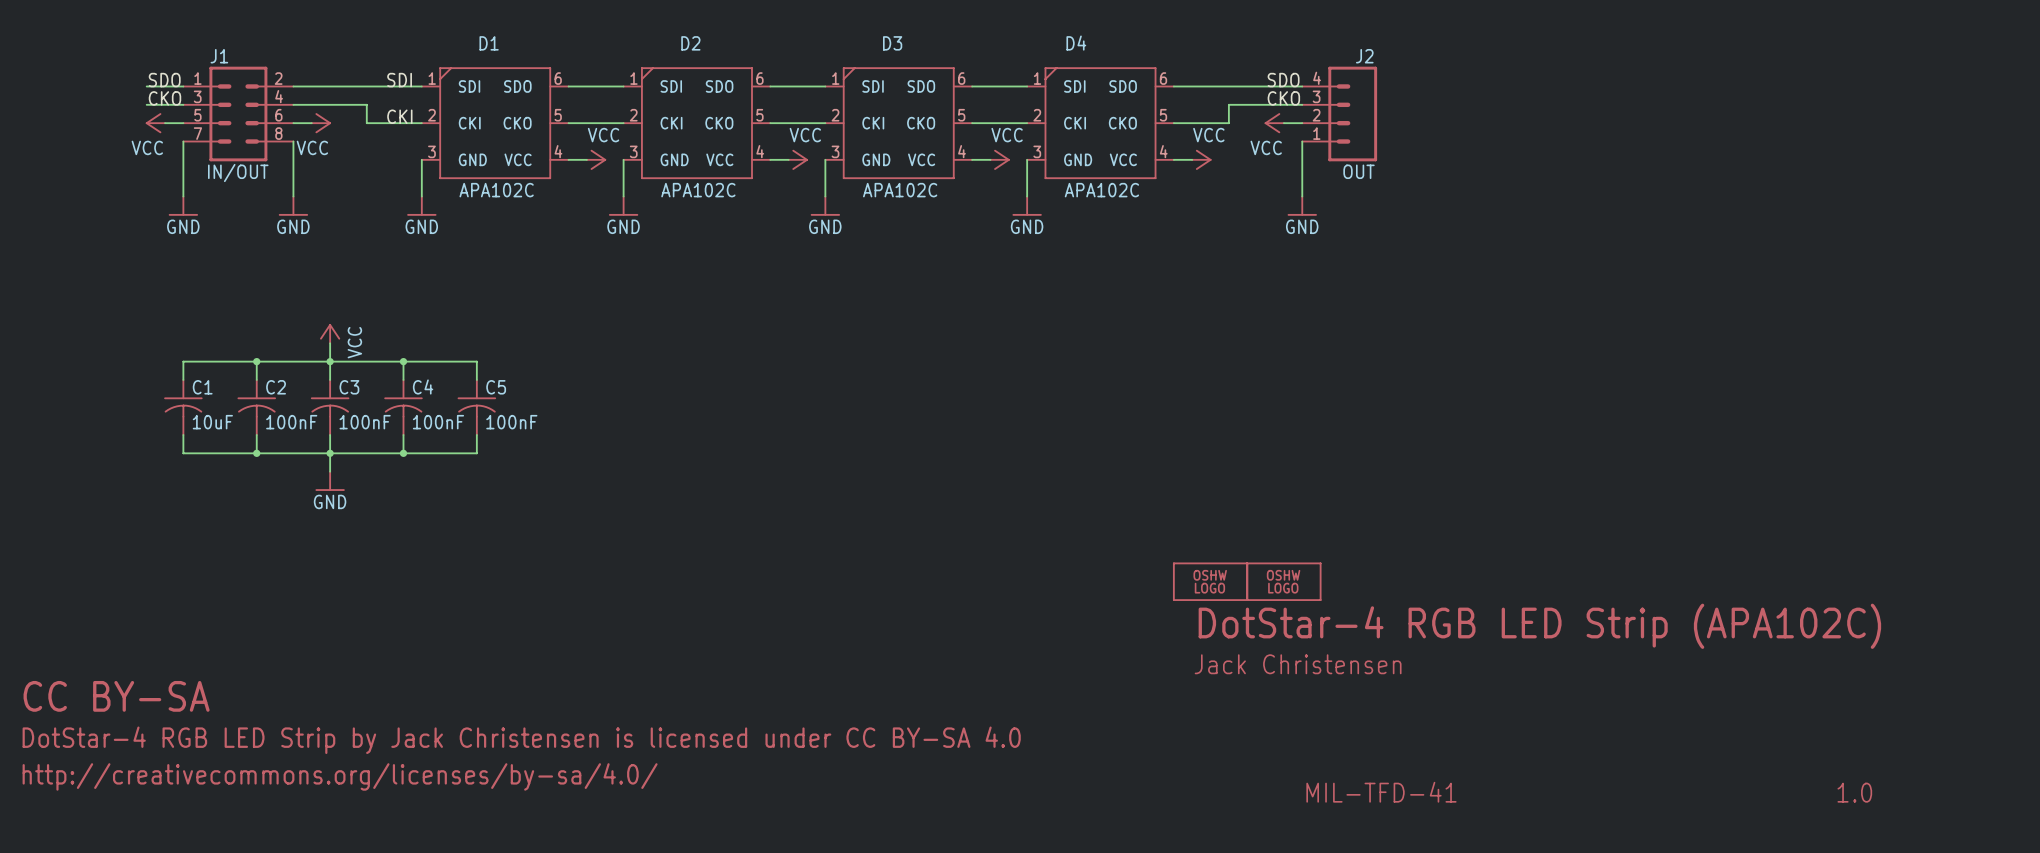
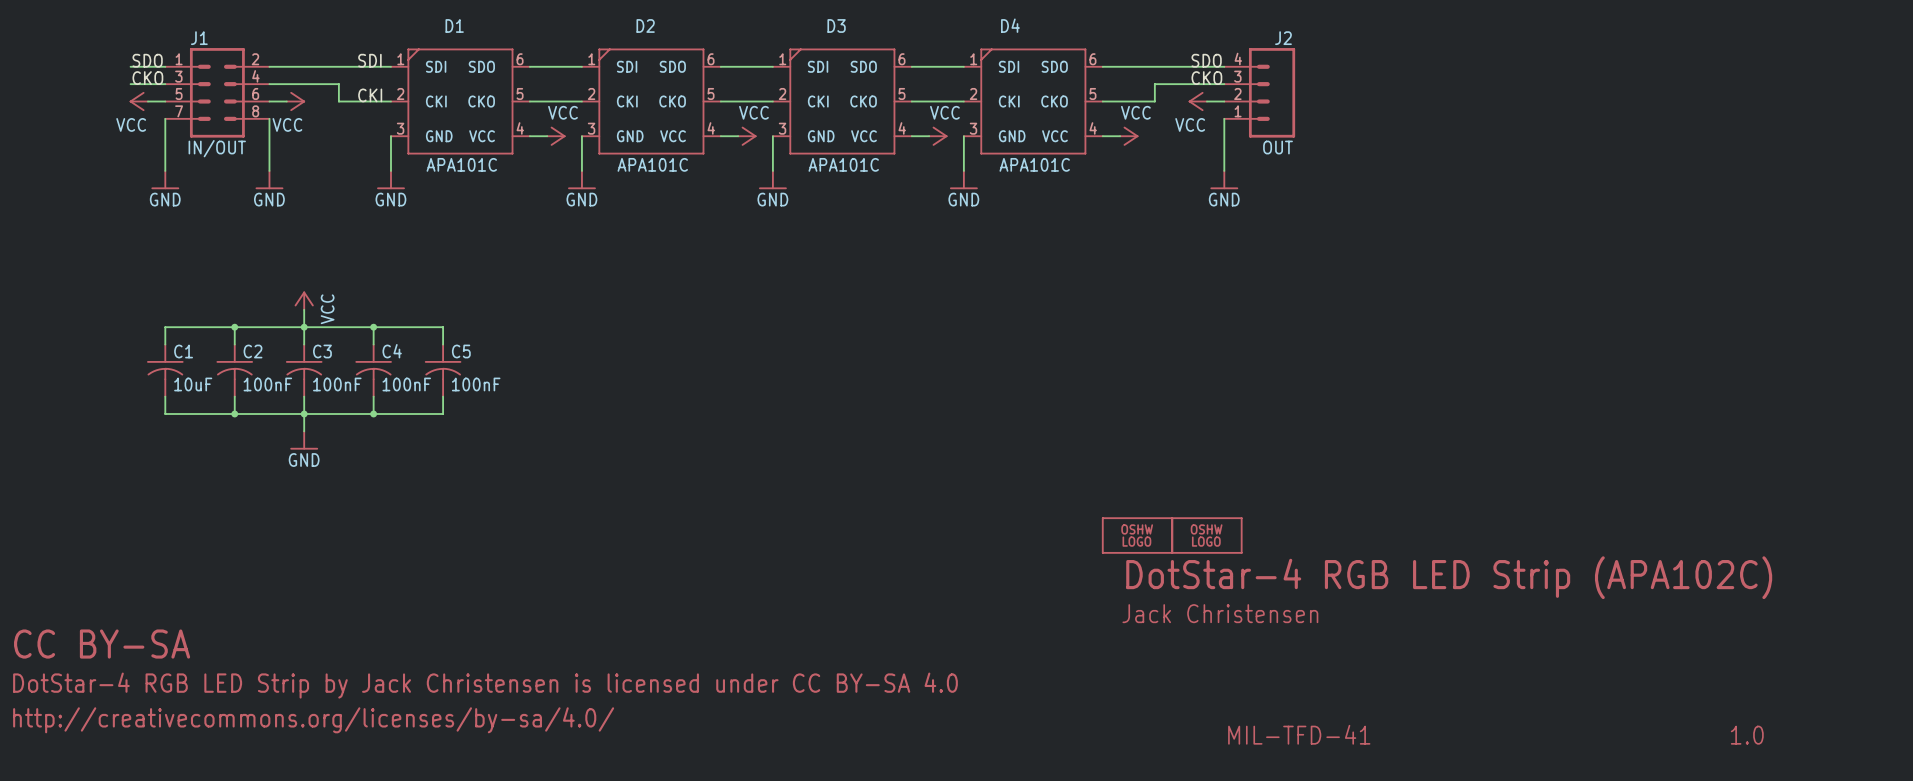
D1 value: APA102C (496, 190) -> APA101C (461, 164)
D2 value: APA102C (698, 190) -> APA101C (652, 164)
D3 value: APA102C (900, 190) -> APA101C (843, 164)
D4 value: APA102C (1101, 190) -> APA101C (1034, 164)

